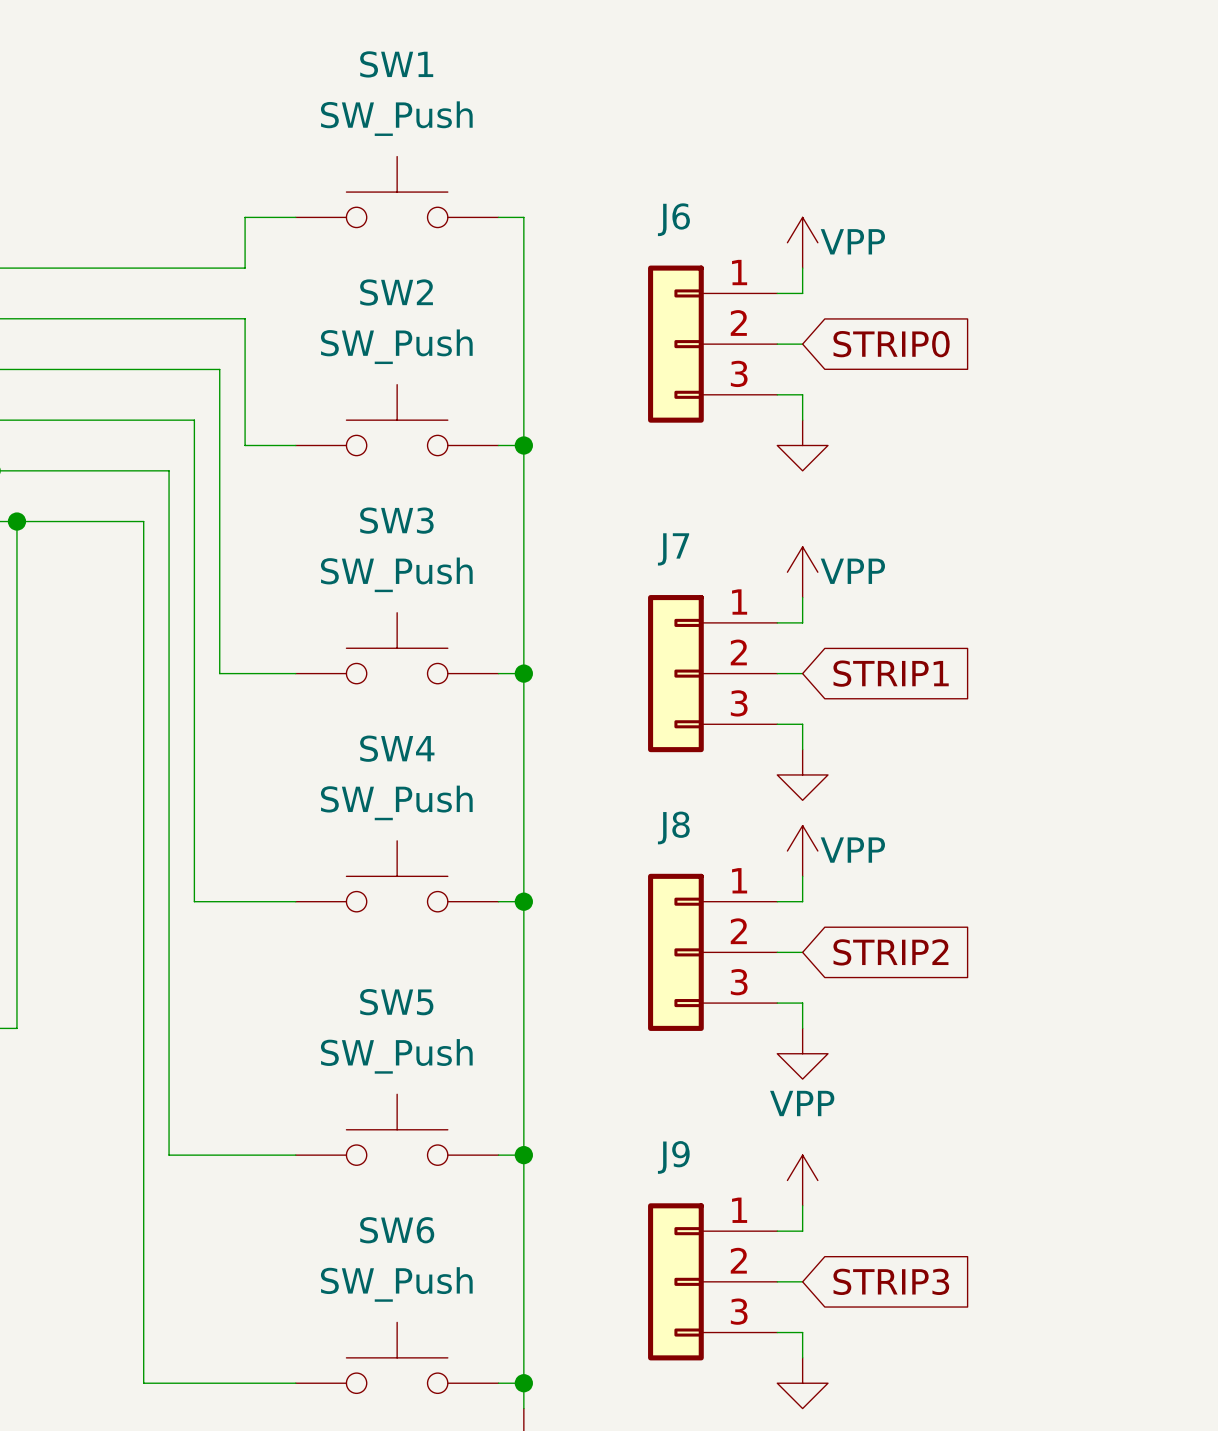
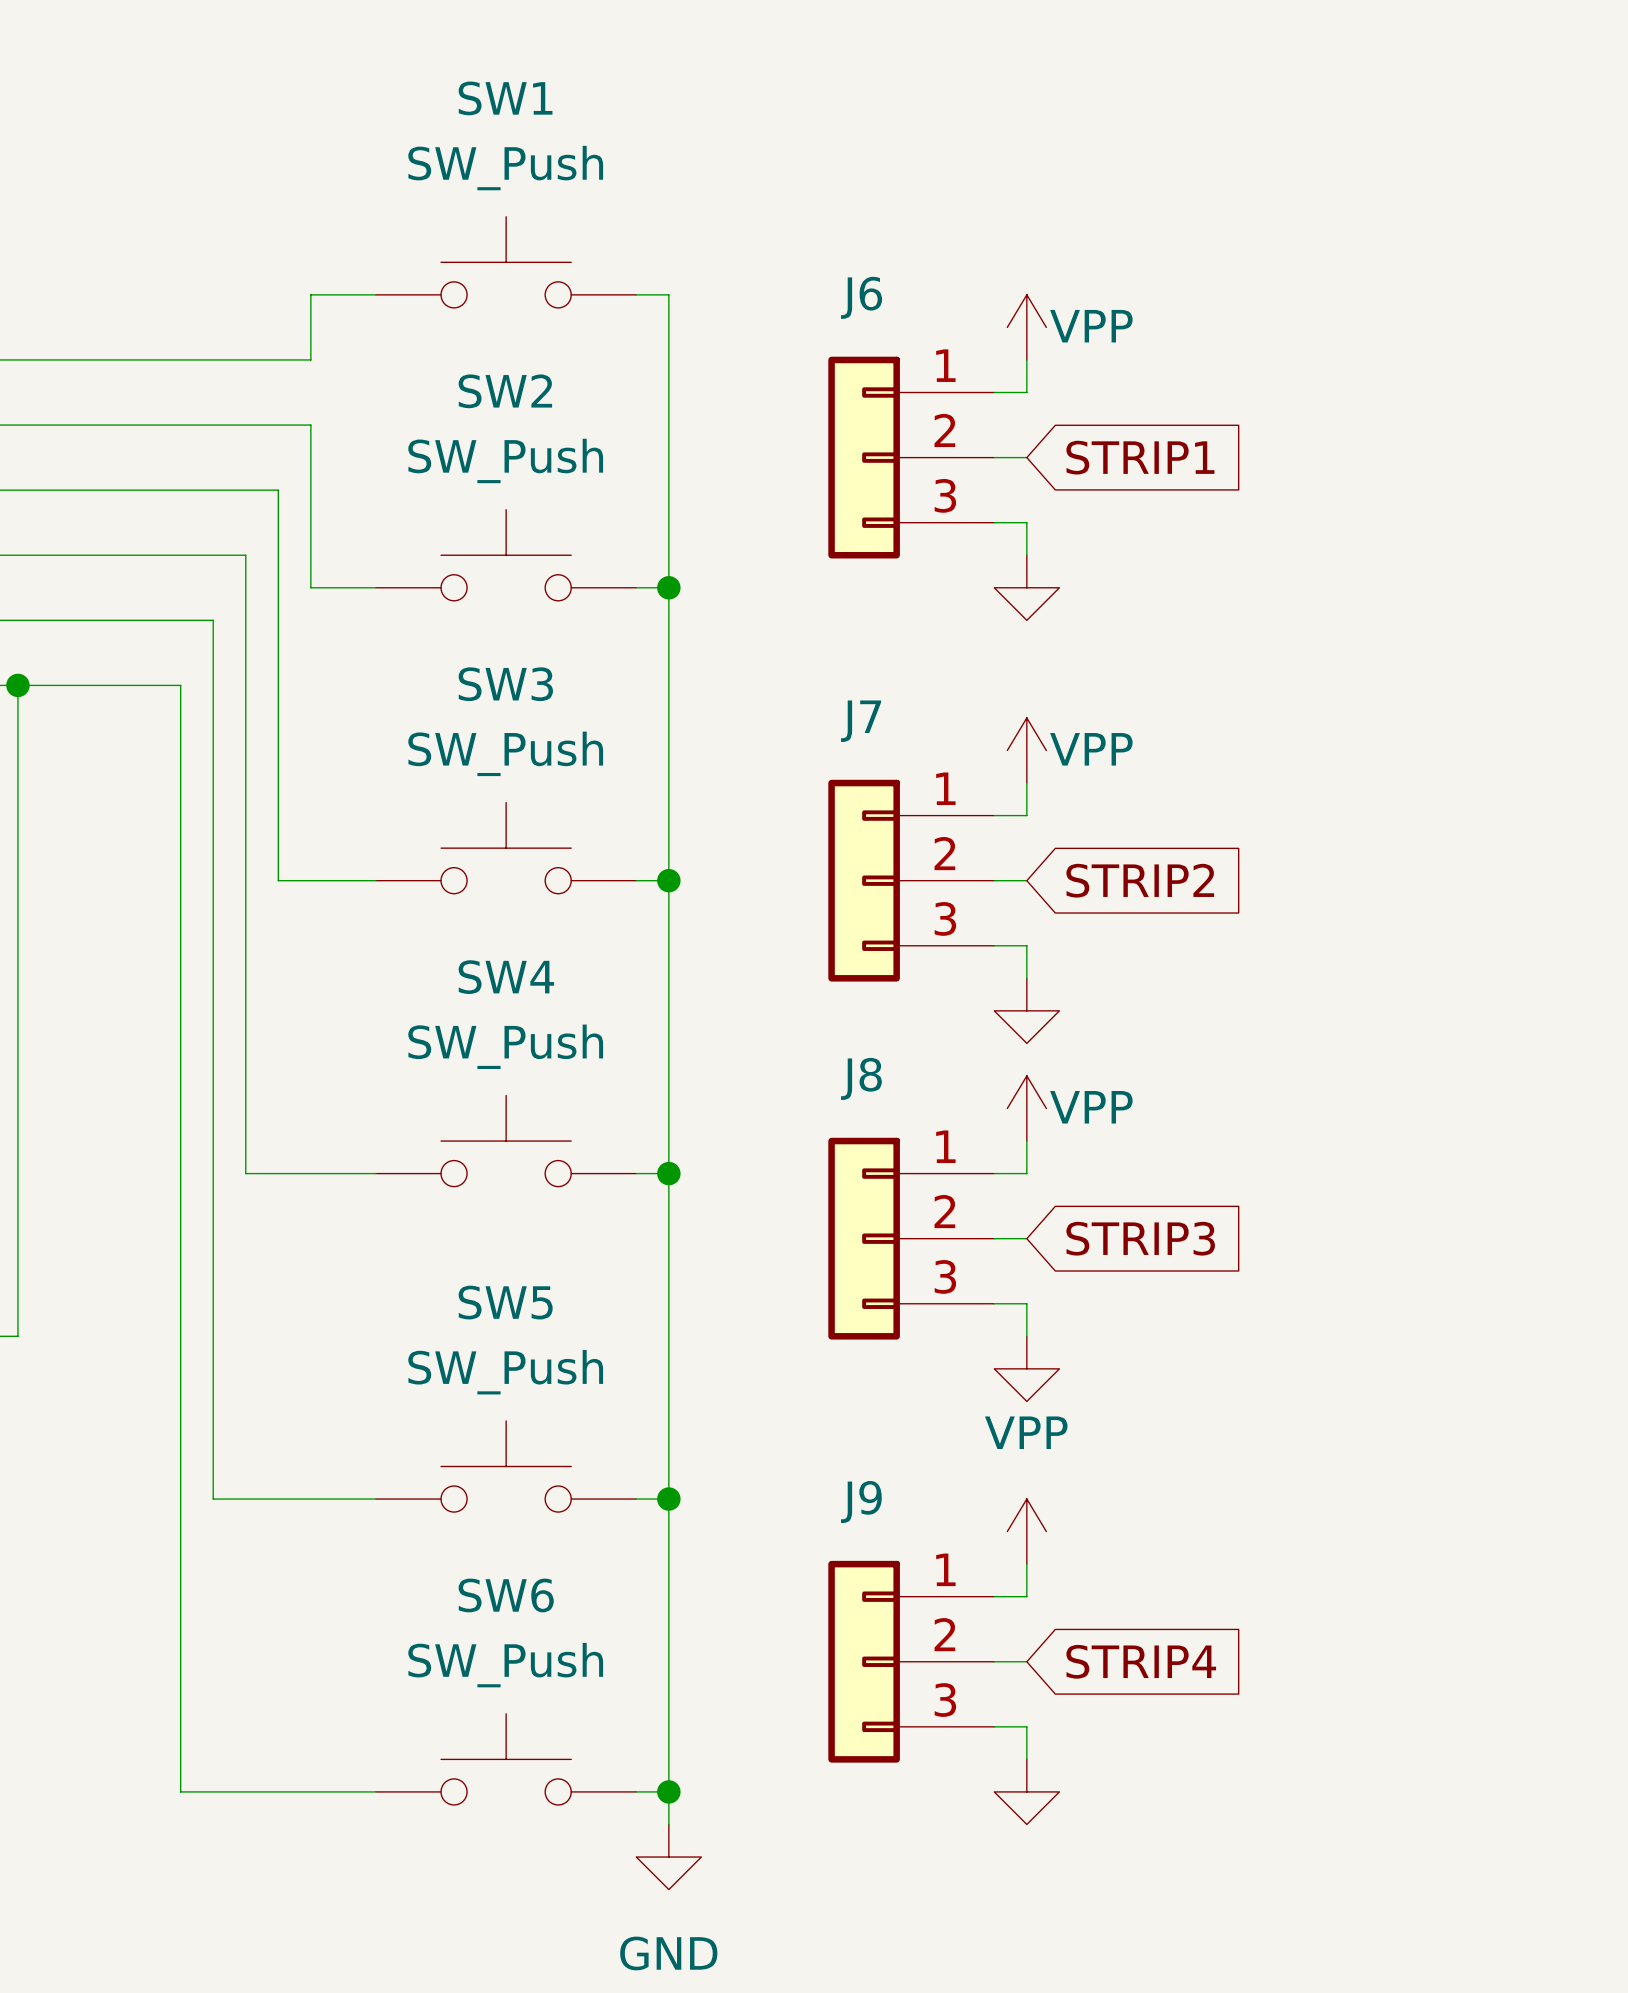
global label: STRIP0 (891, 344) -> STRIP1 (1140, 457)
global label: STRIP1 (891, 673) -> STRIP2 (1140, 880)
global label: STRIP2 (890, 952) -> STRIP3 (1140, 1238)
global label: STRIP3 (891, 1281) -> STRIP4 (1141, 1661)

